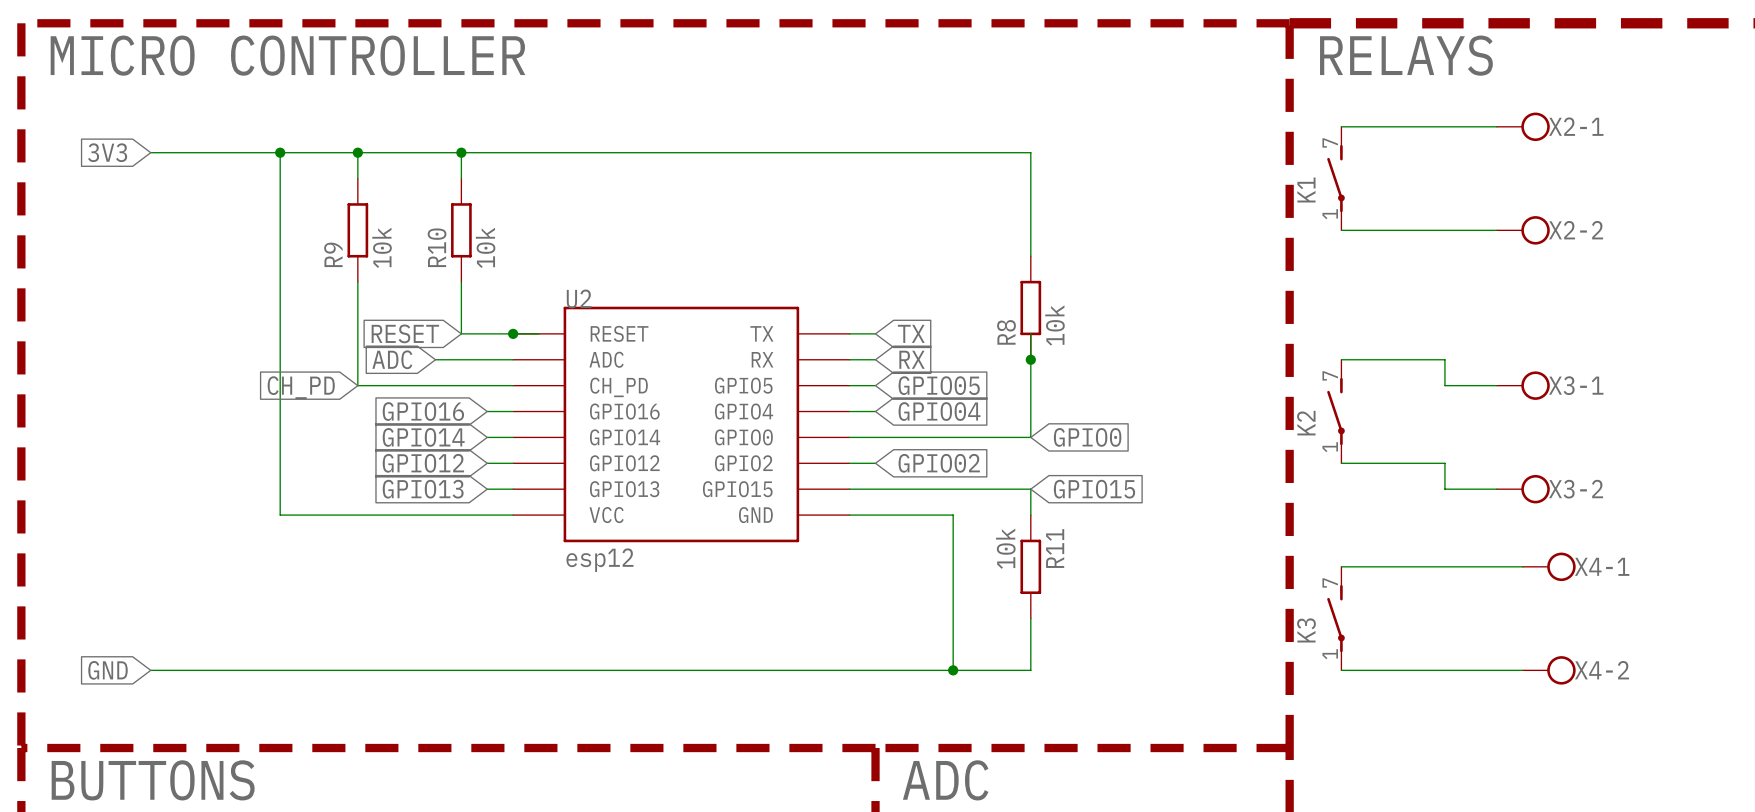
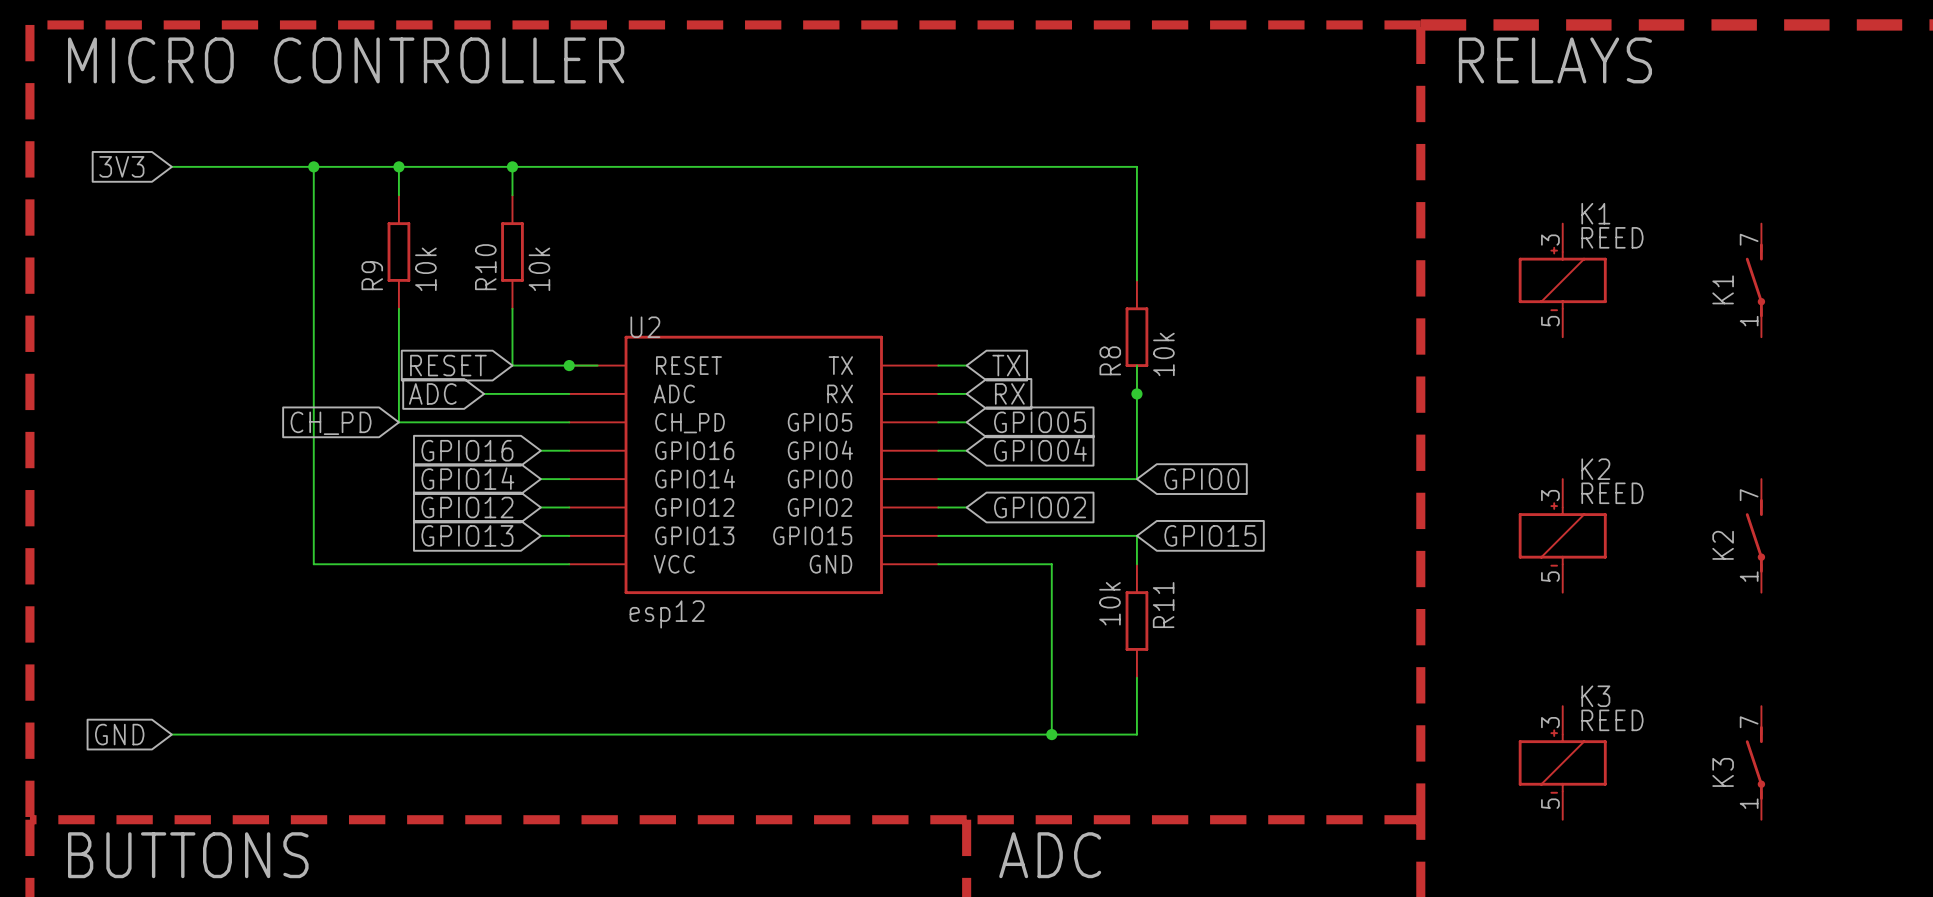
wire: (1341, 126) (1496, 126) -> none
X2-1: (1523, 126) -> none
K1: (1335, 178) -> none
wire: (1341, 230) (1496, 230) -> none
X2-2: (1523, 230) -> none
K1: none -> REED (1562, 280)
K1: none -> (1755, 280)
wire: (1341, 359) (1444, 359) (1444, 385) (1496, 385) -> none
X3-1: (1523, 385) -> none
K2: (1335, 411) -> none
wire: (1341, 463) (1444, 463) (1444, 489) (1496, 489) -> none
K2: none -> REED (1562, 535)
X3-2: (1523, 489) -> none
K2: none -> (1755, 535)
wire: (1341, 566) (1522, 566) -> none
X4-1: (1549, 566) -> none
K3: (1335, 618) -> none
wire: (1341, 670) (1522, 670) -> none
X4-2: (1549, 670) -> none
K3: none -> REED (1562, 762)
K3: none -> (1755, 762)

